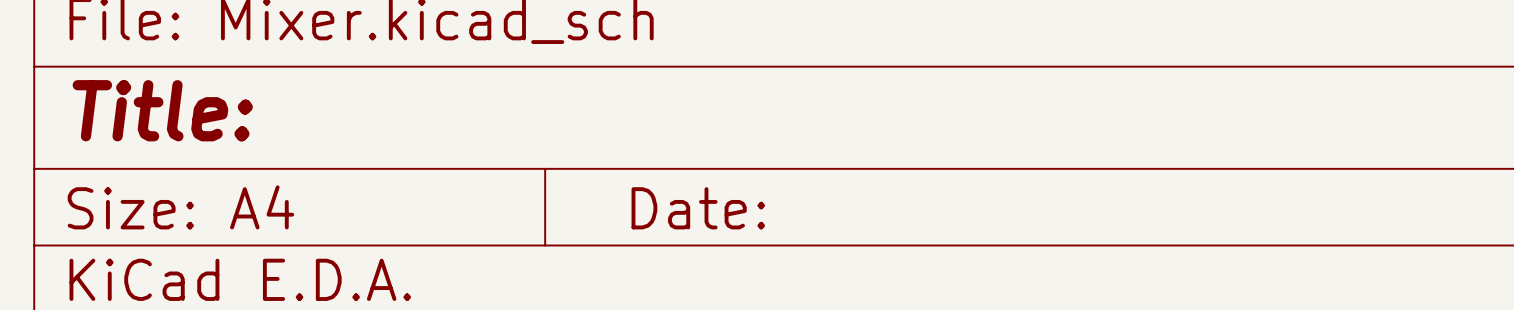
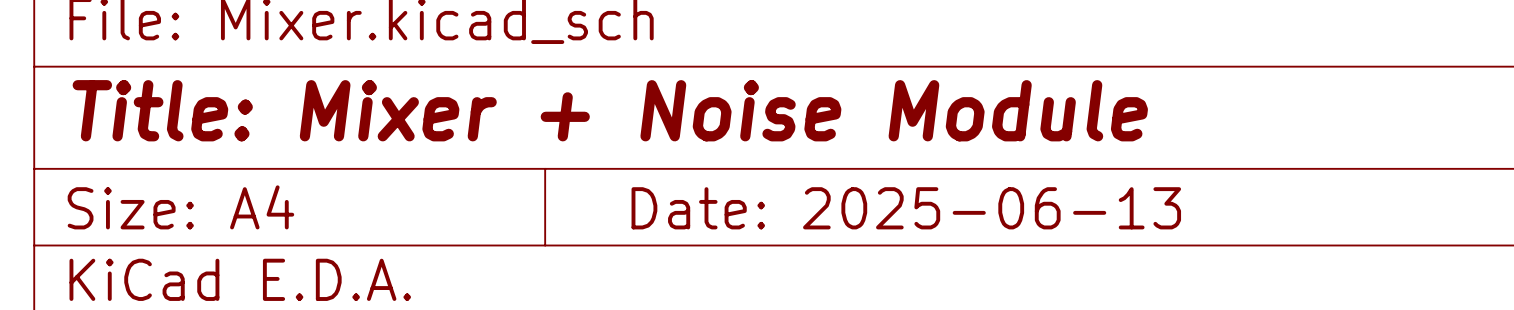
title block: Title: (162, 110) -> Title: Mixer + Noise Module (610, 110)
title block: Date: (698, 208) -> Date: 2025-06-13 (906, 208)

